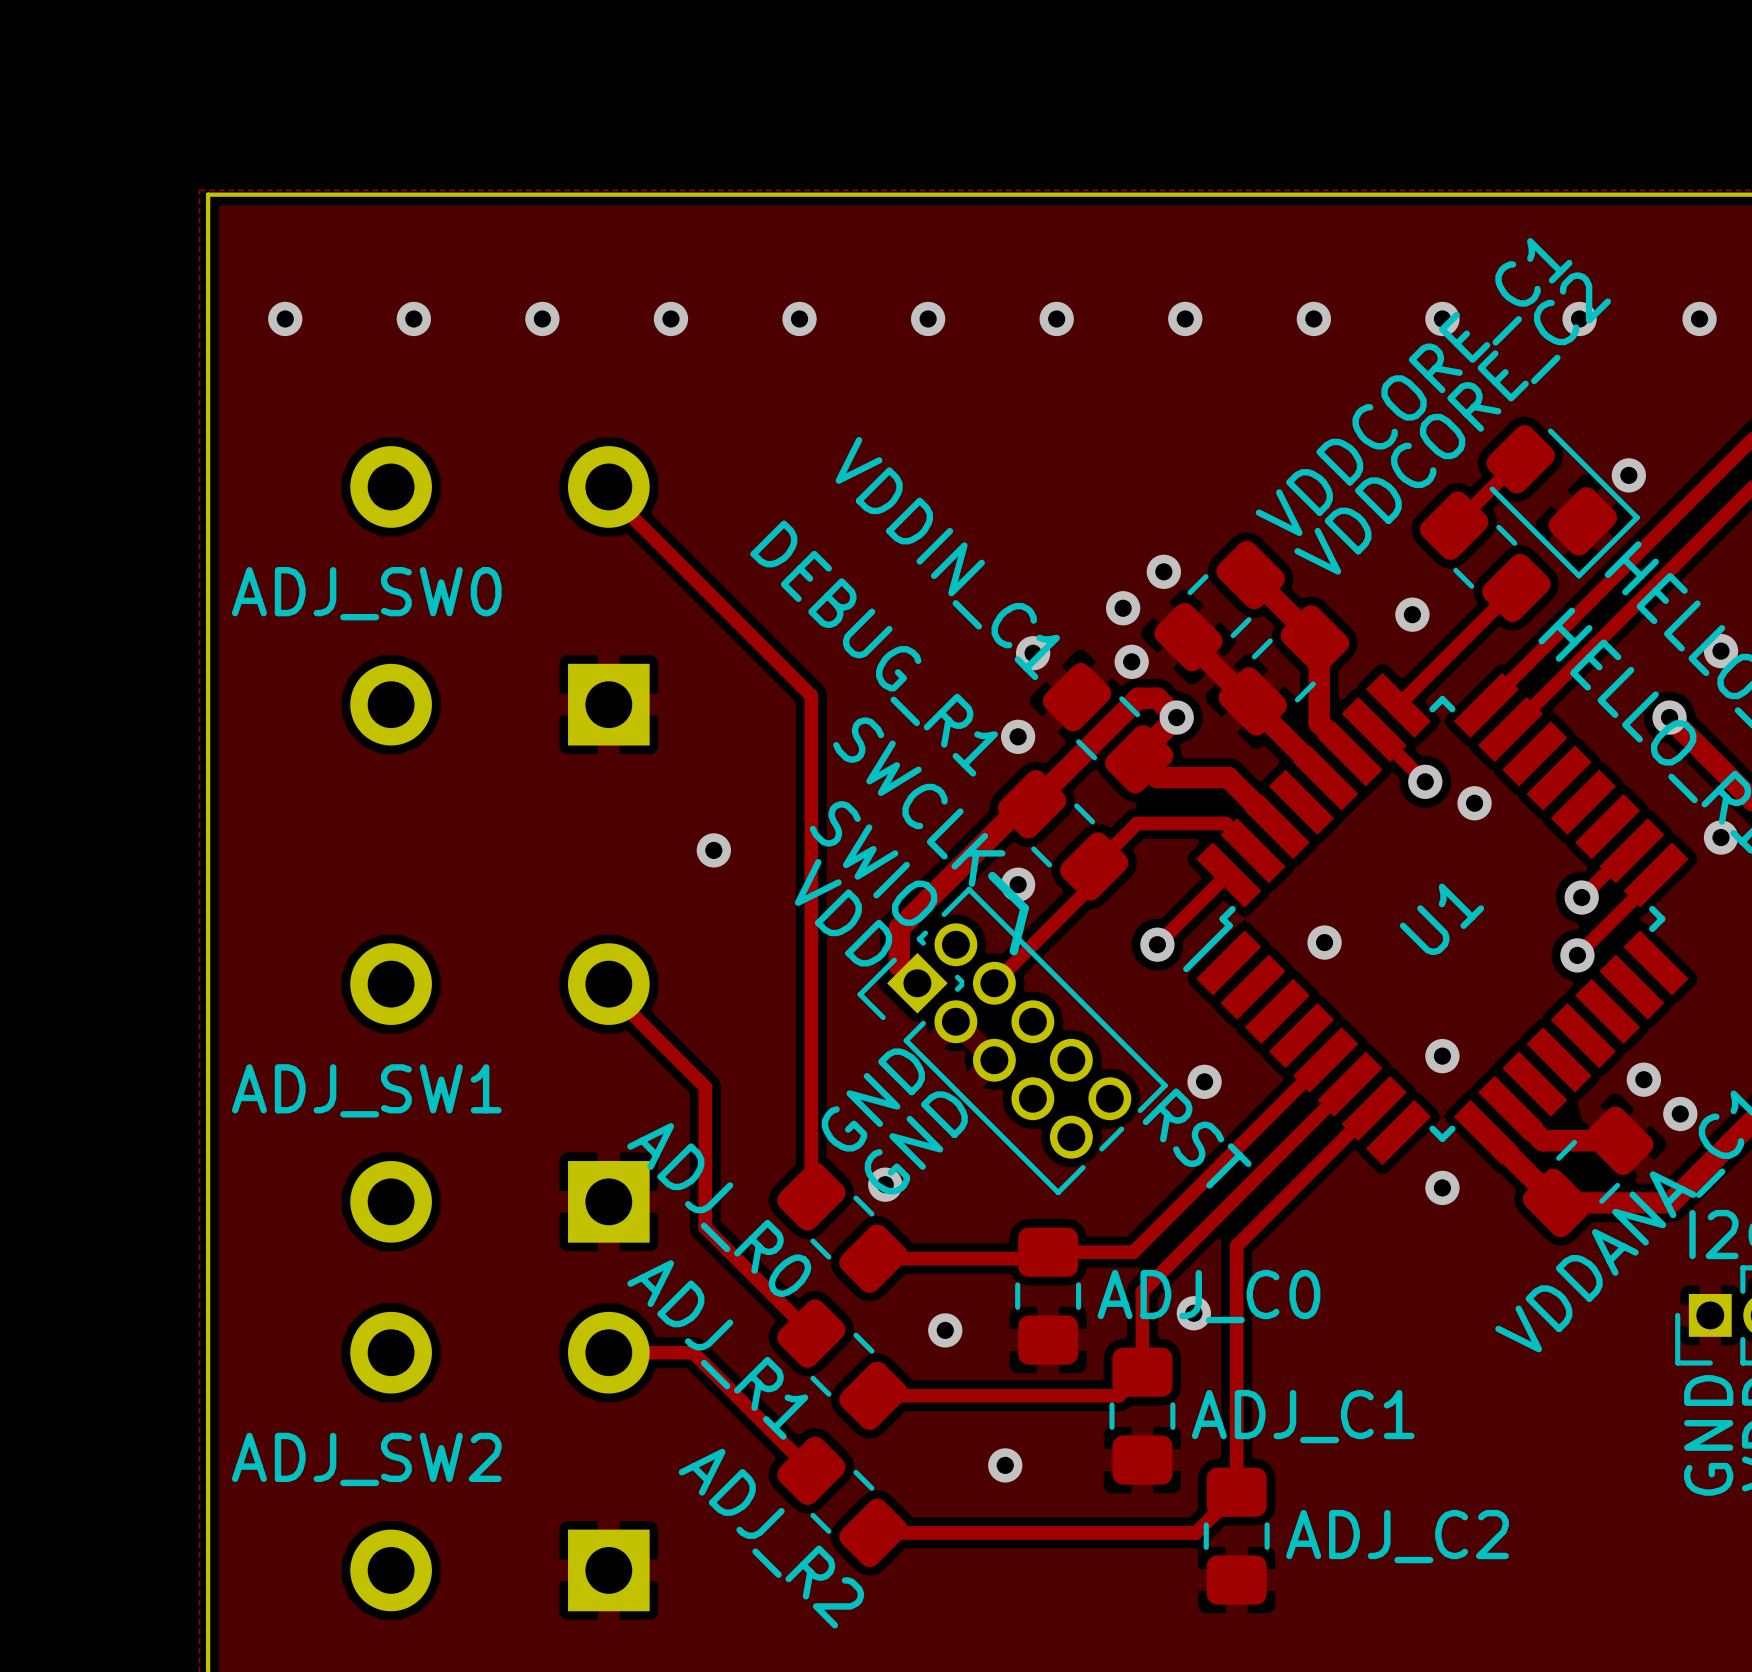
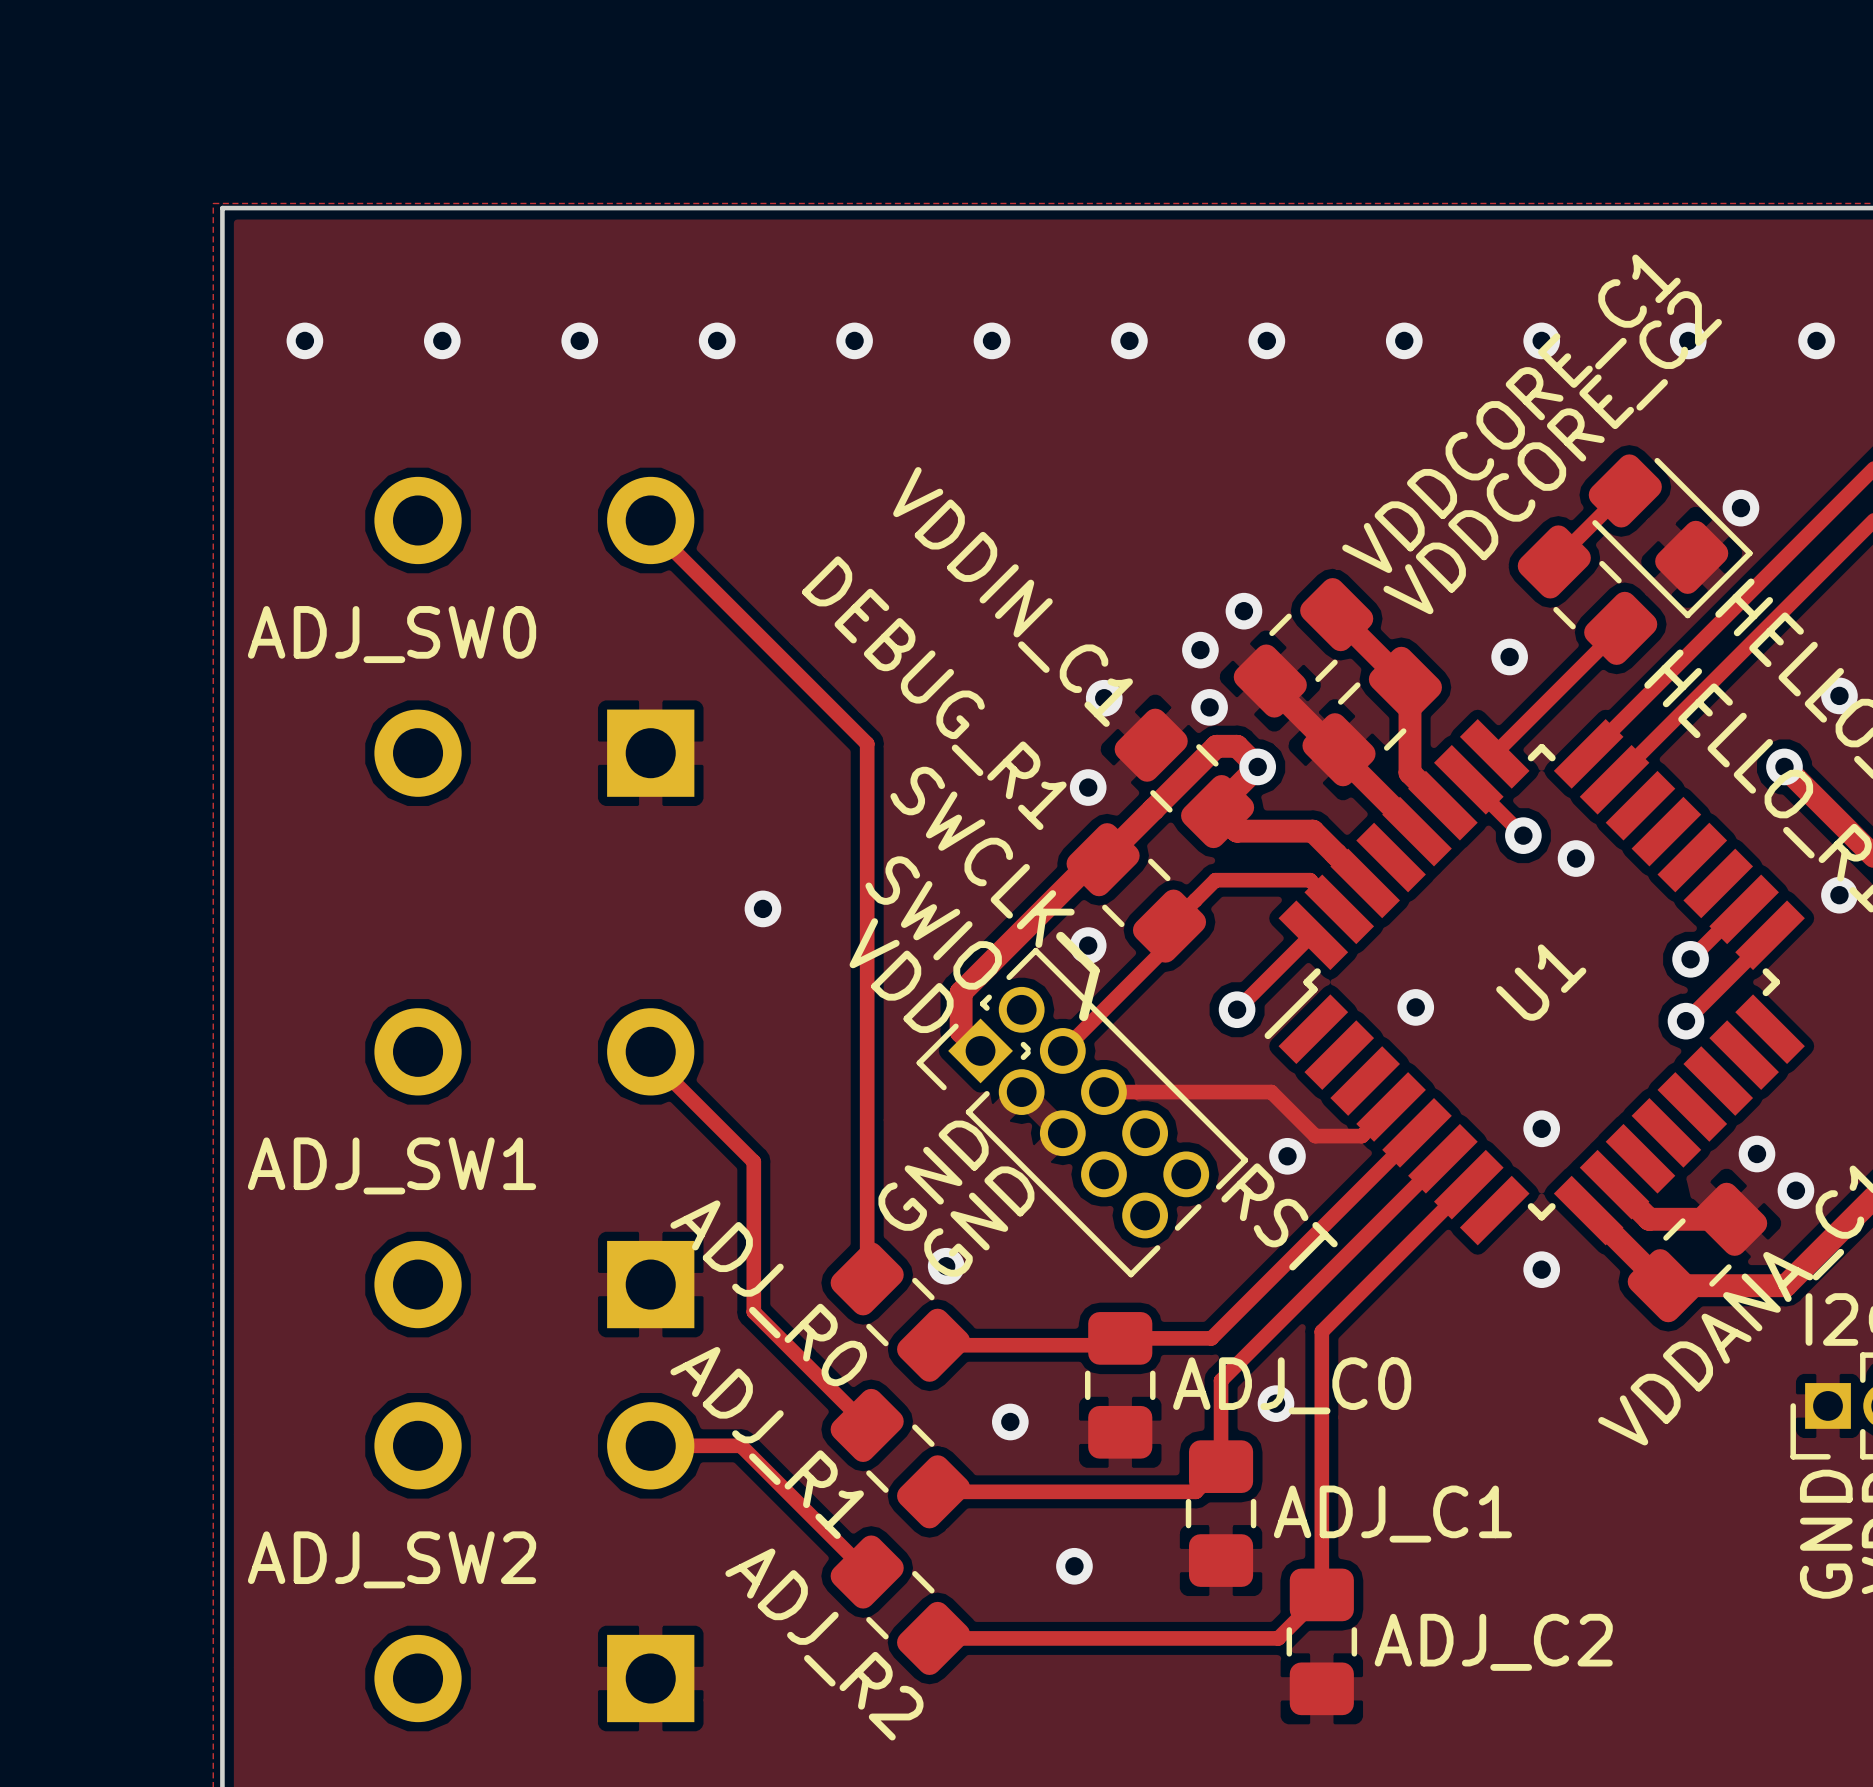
track: none -> (1103, 1092) (1271, 1092) (1315, 1136) (1361, 1136) (1391, 1106)

